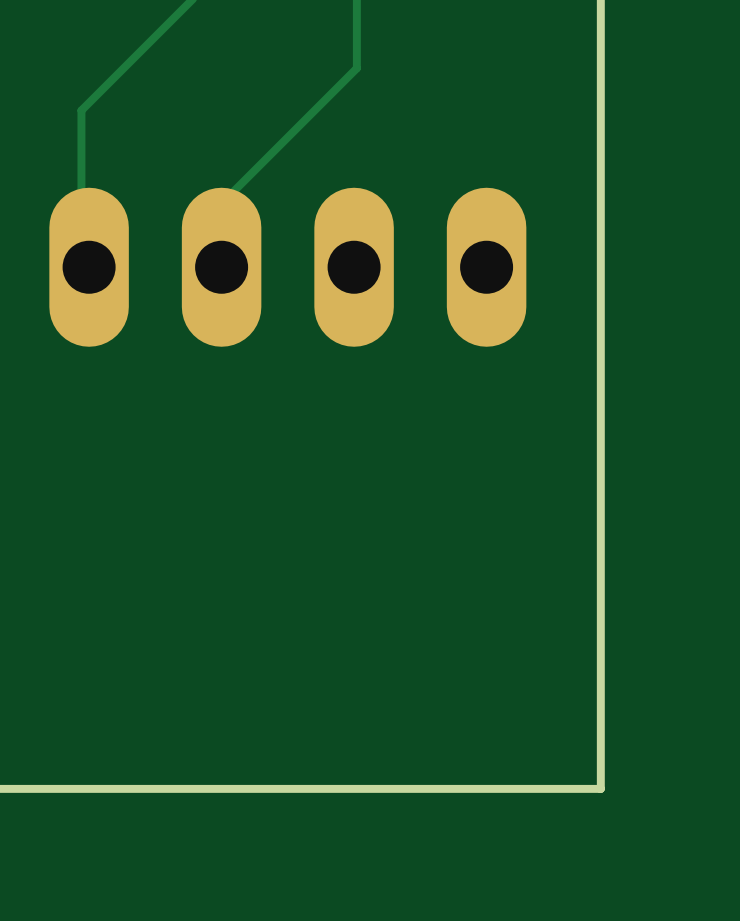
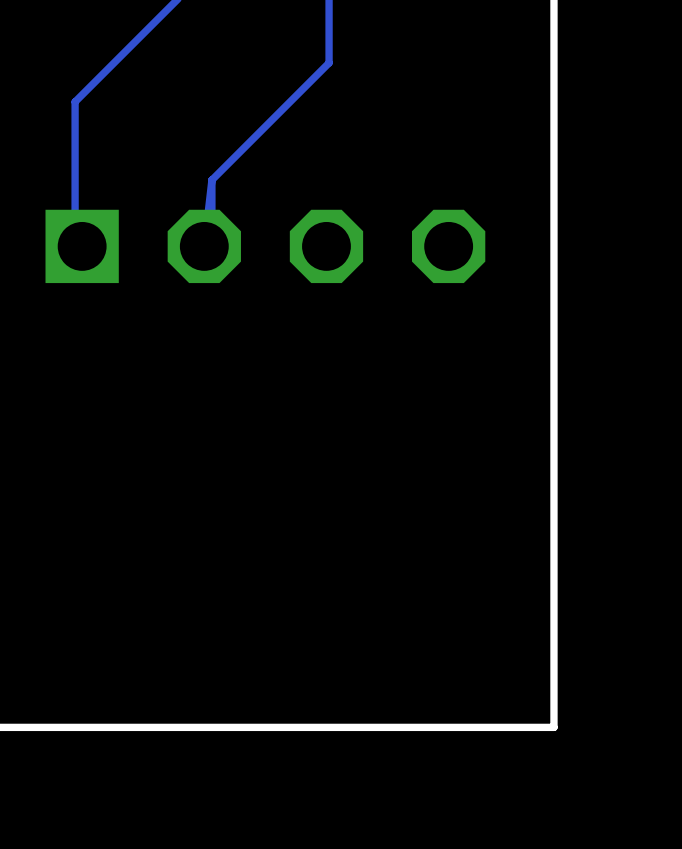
part footprint: [49, 187, 527, 347] -> [45, 209, 486, 284]

